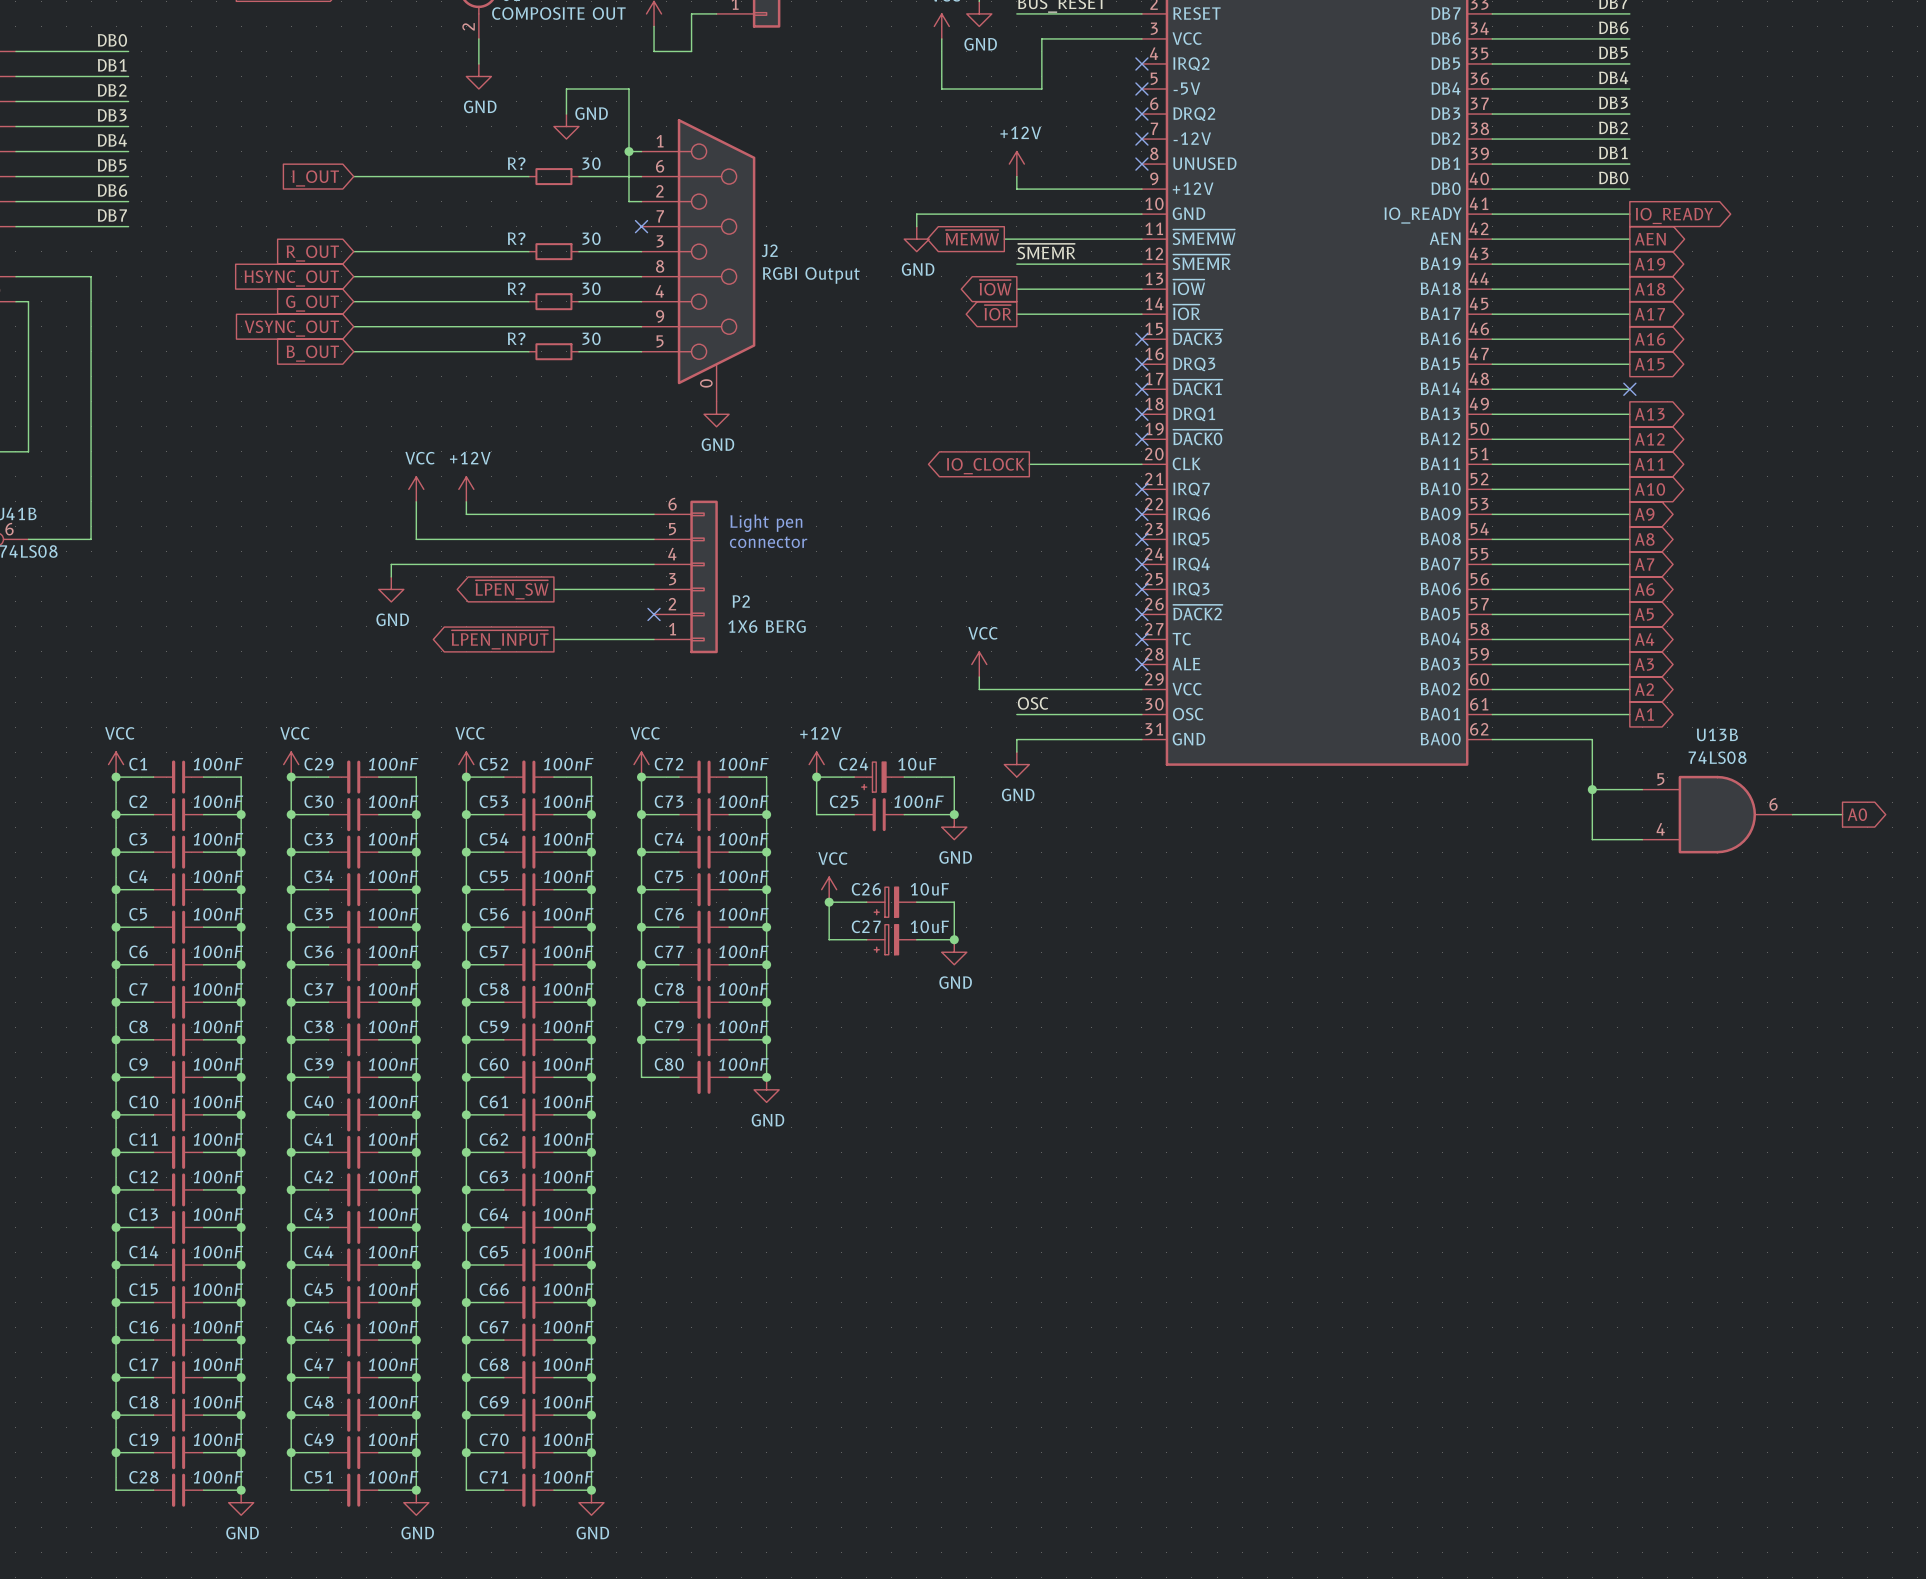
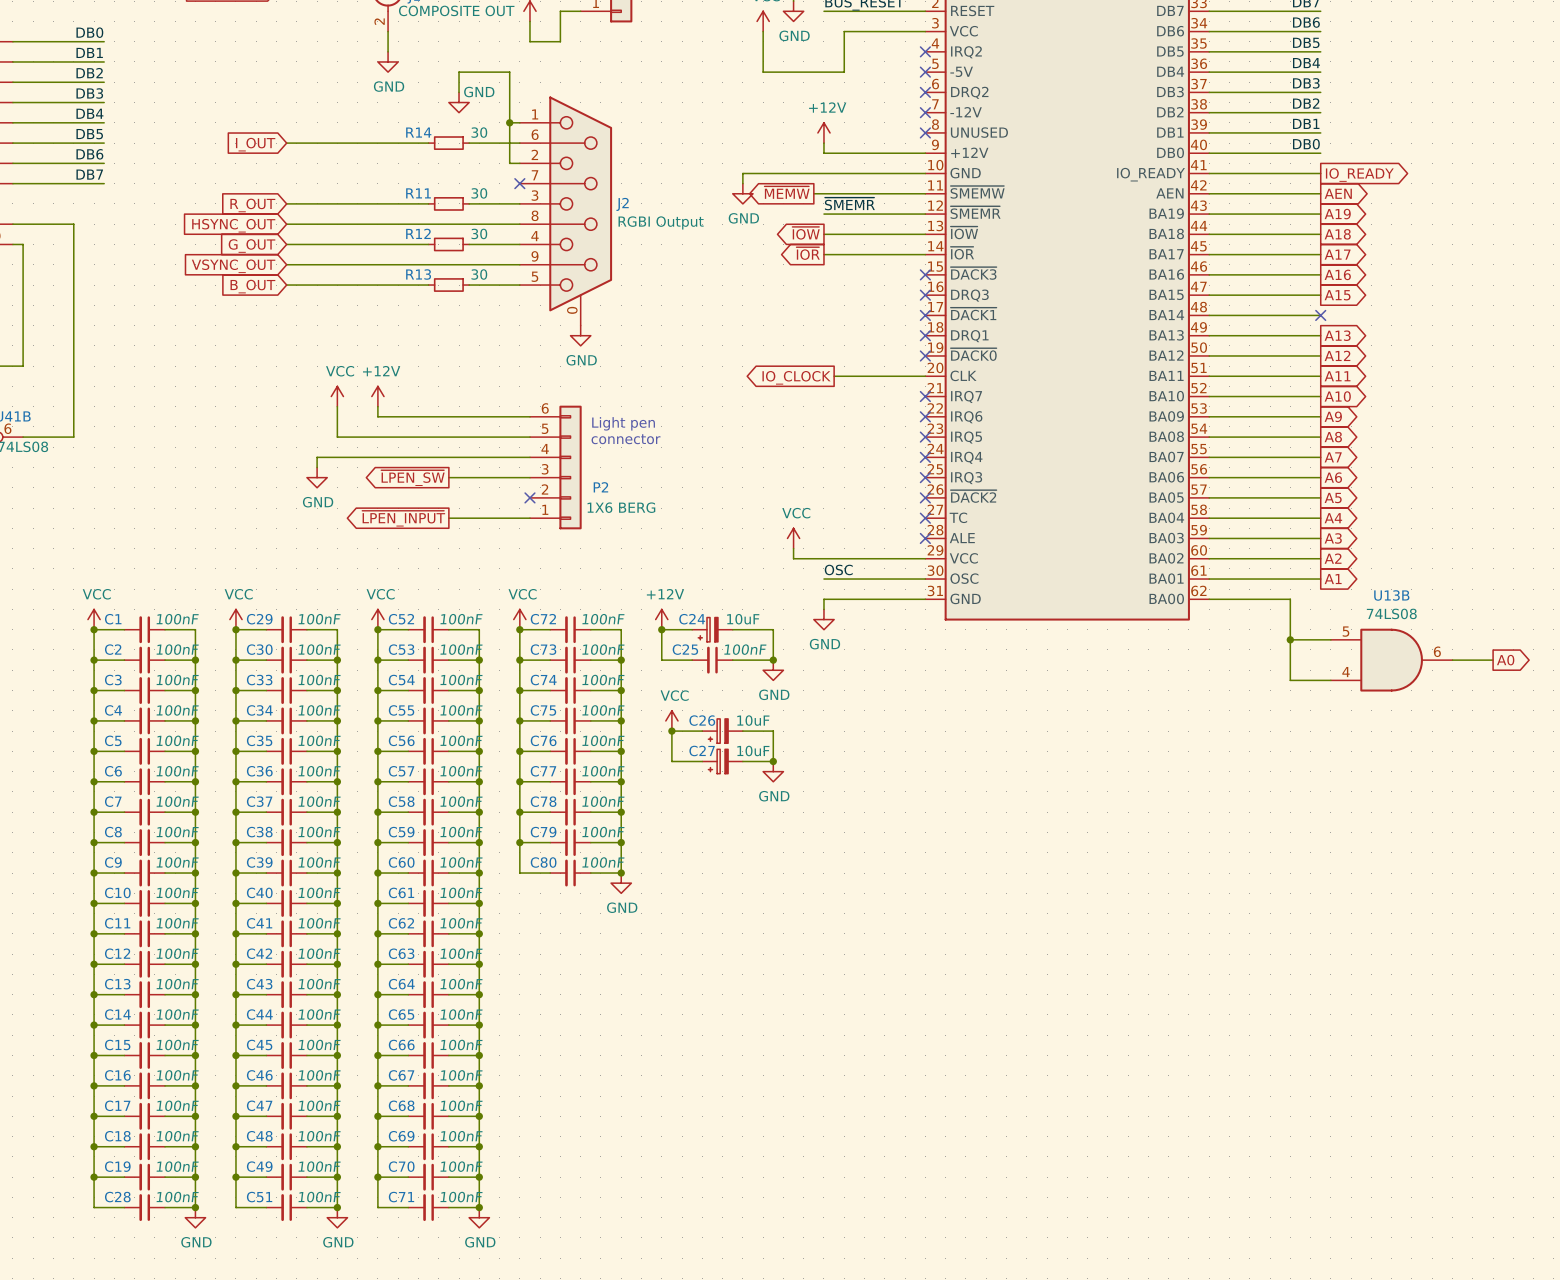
R? name: R? (516, 163) -> R14 (418, 132)
R? name: R? (516, 238) -> R11 (418, 193)
R? name: R? (516, 288) -> R12 (418, 233)
R? name: R? (516, 338) -> R13 (418, 274)

